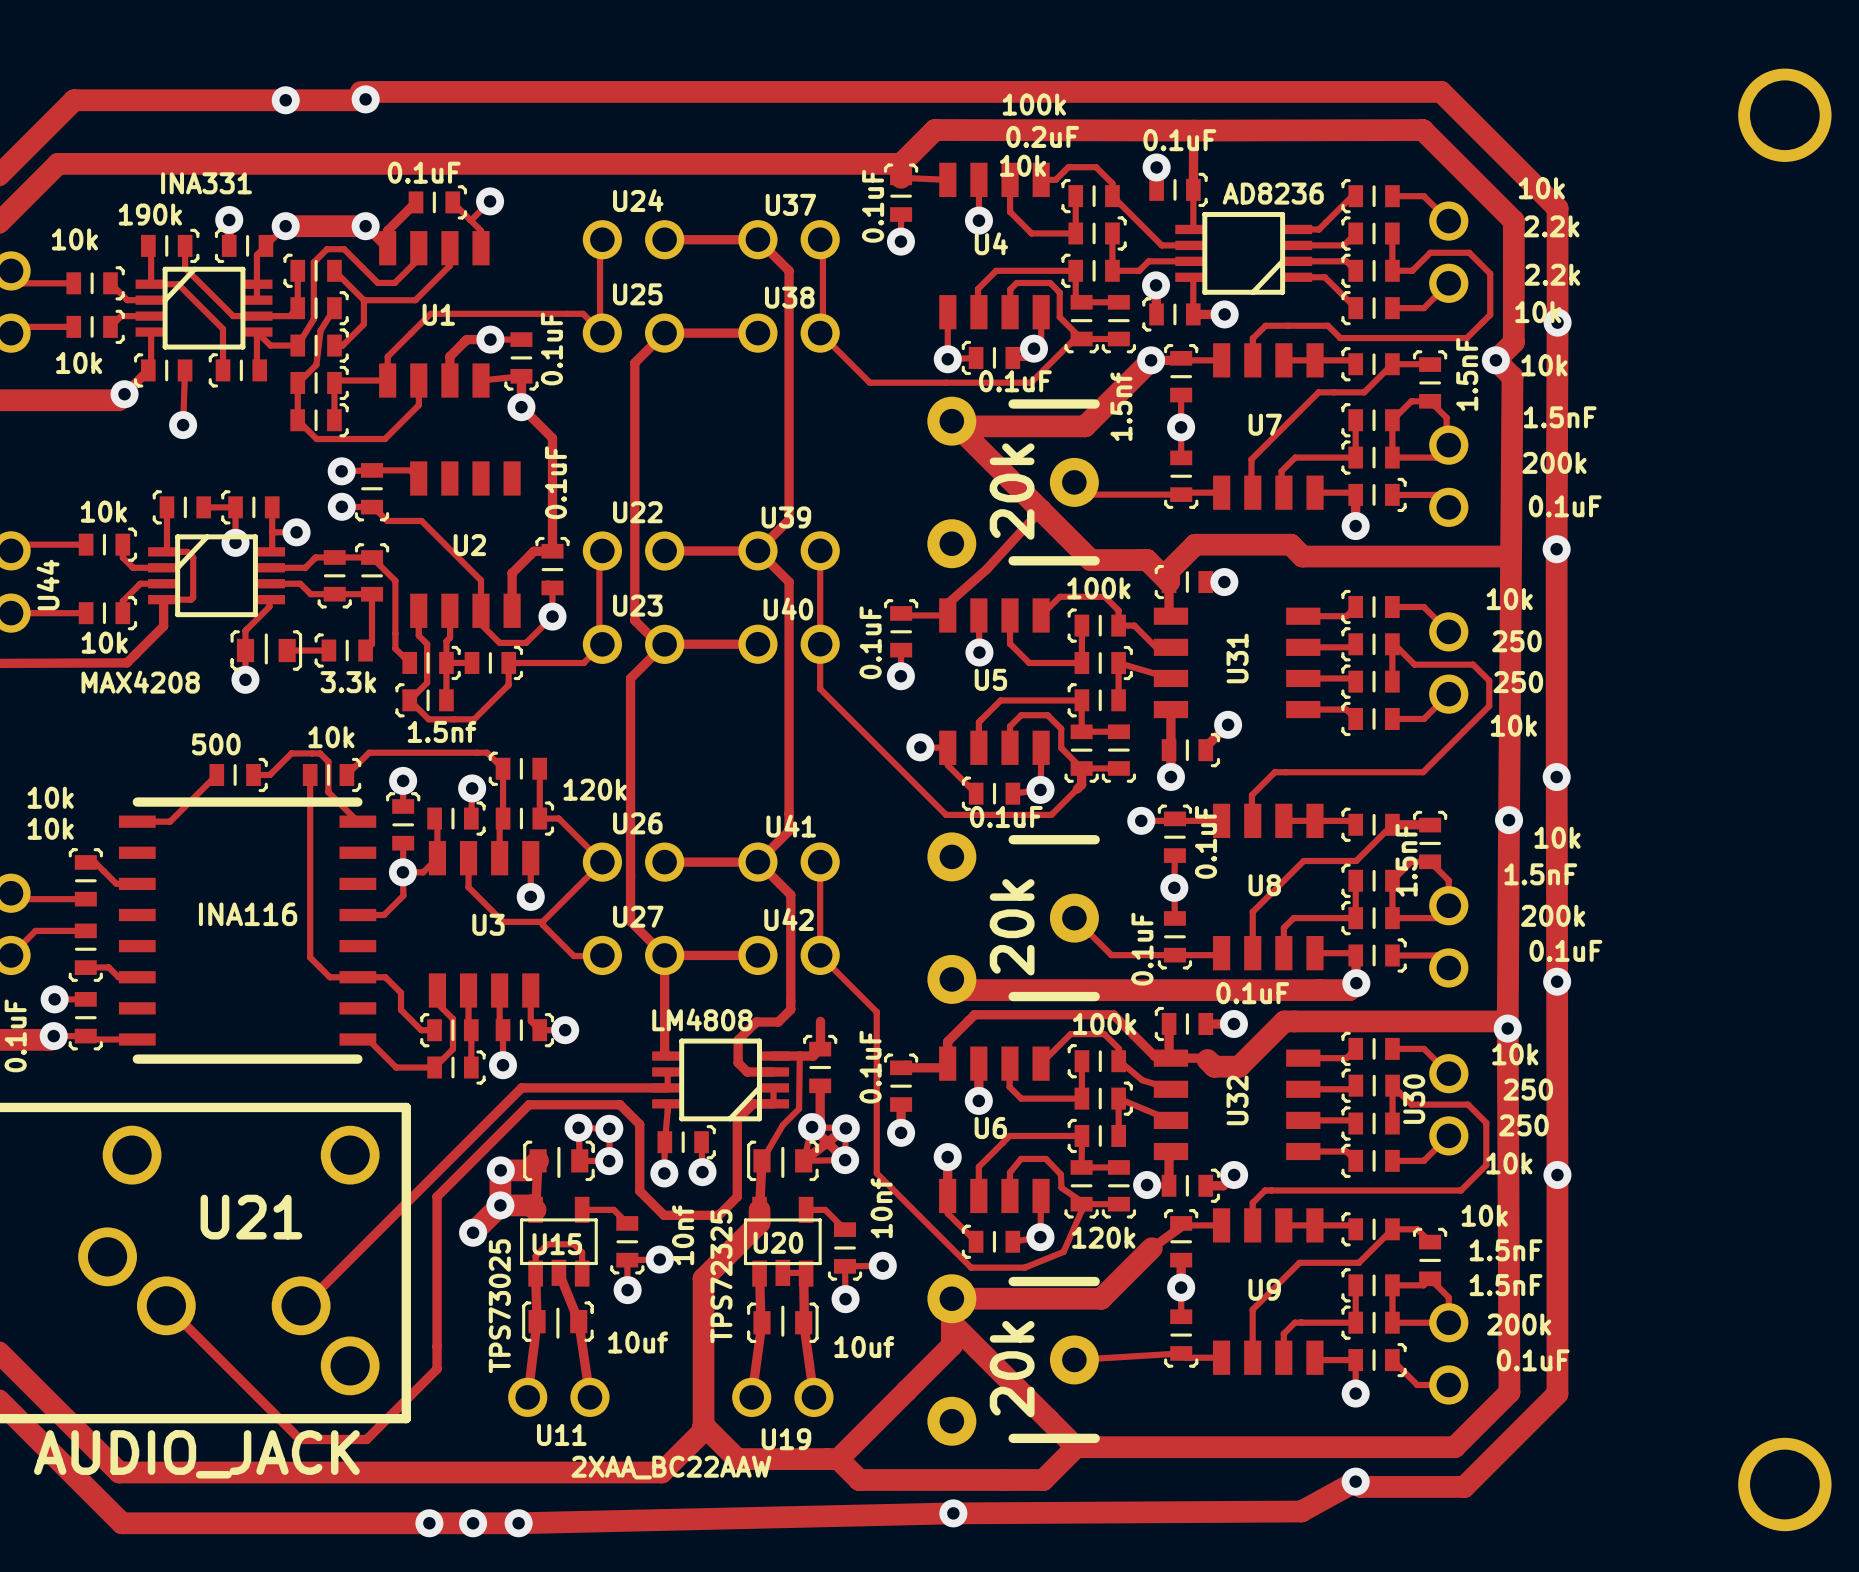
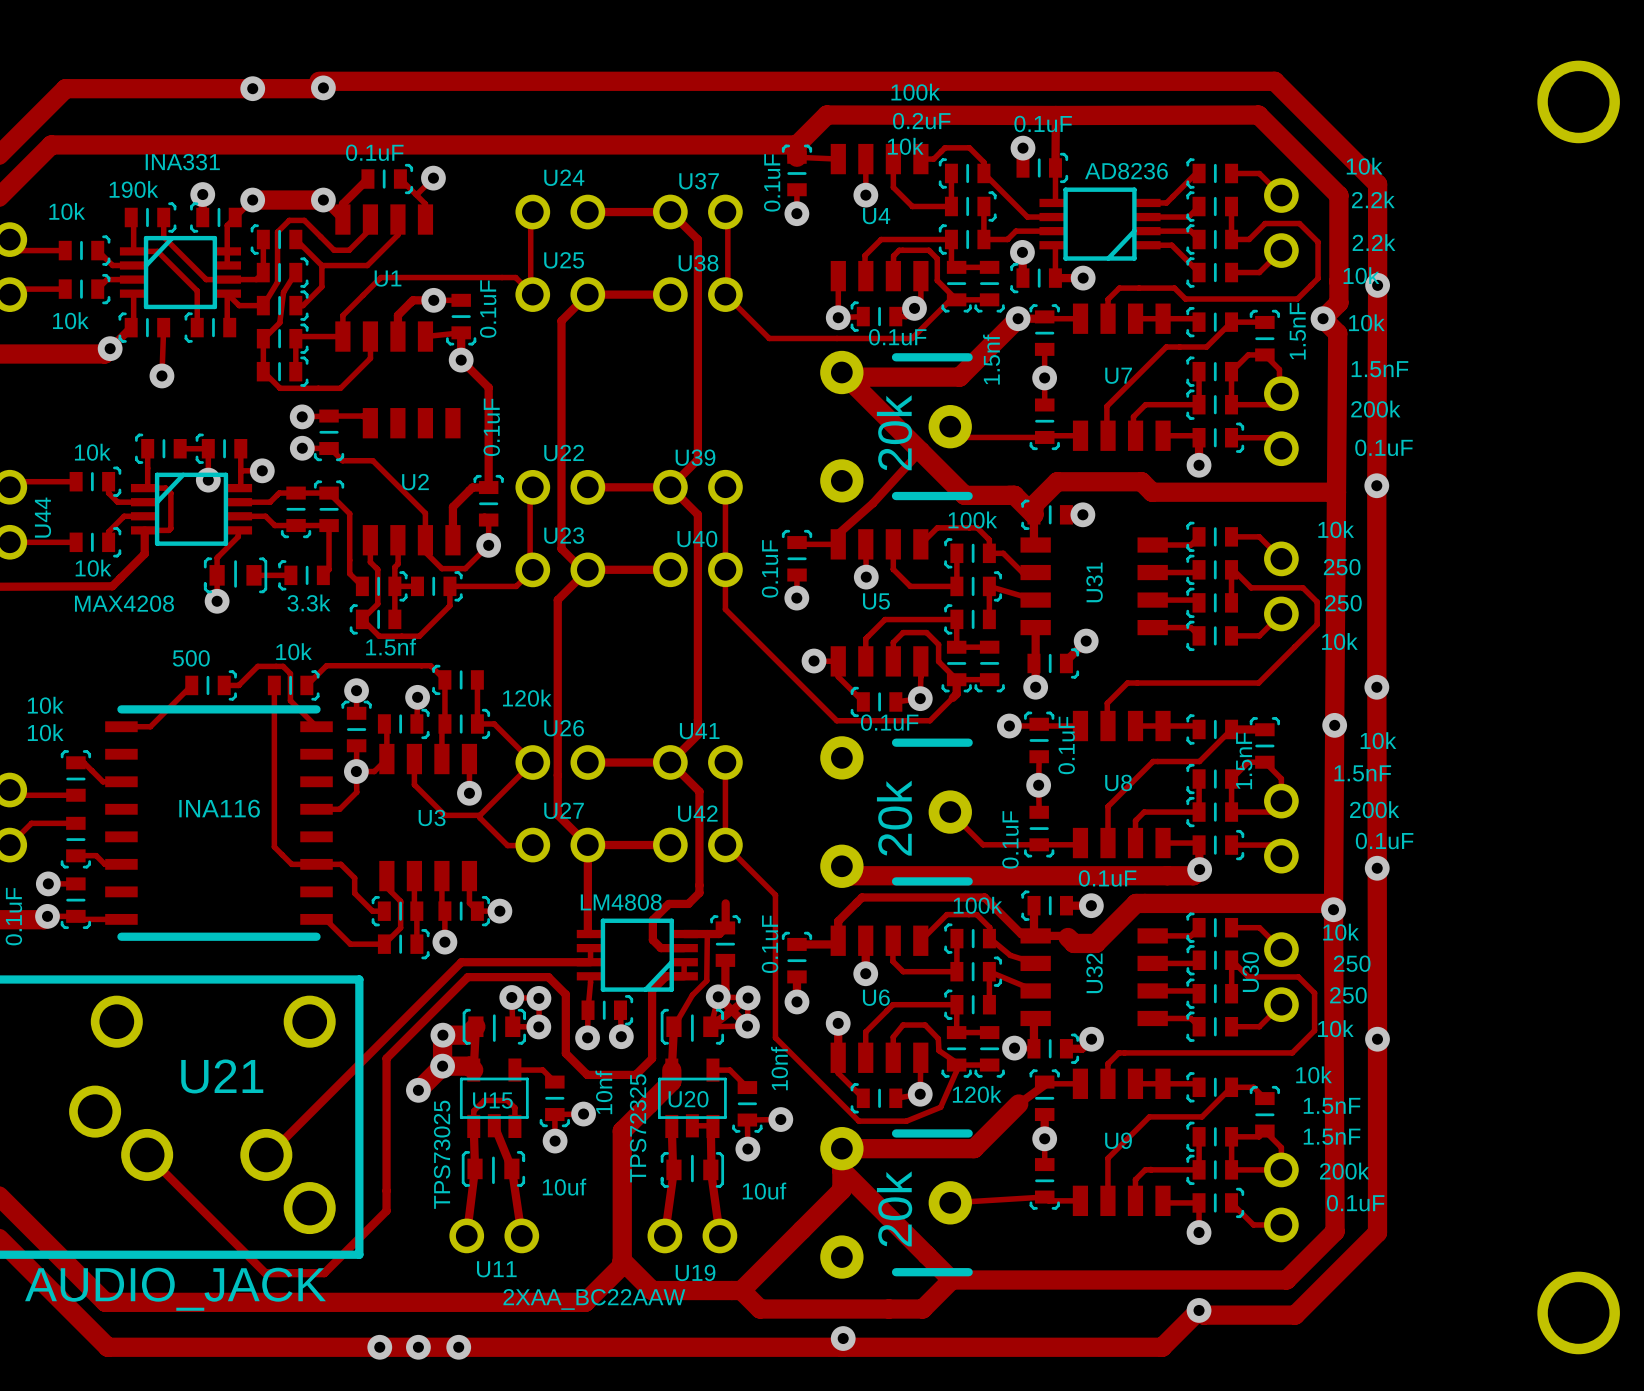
track: (1355, 1481) (1301, 1511) (953, 1513) (518, 1523) -> (1199, 1310) (1162, 1347) (458, 1347)

